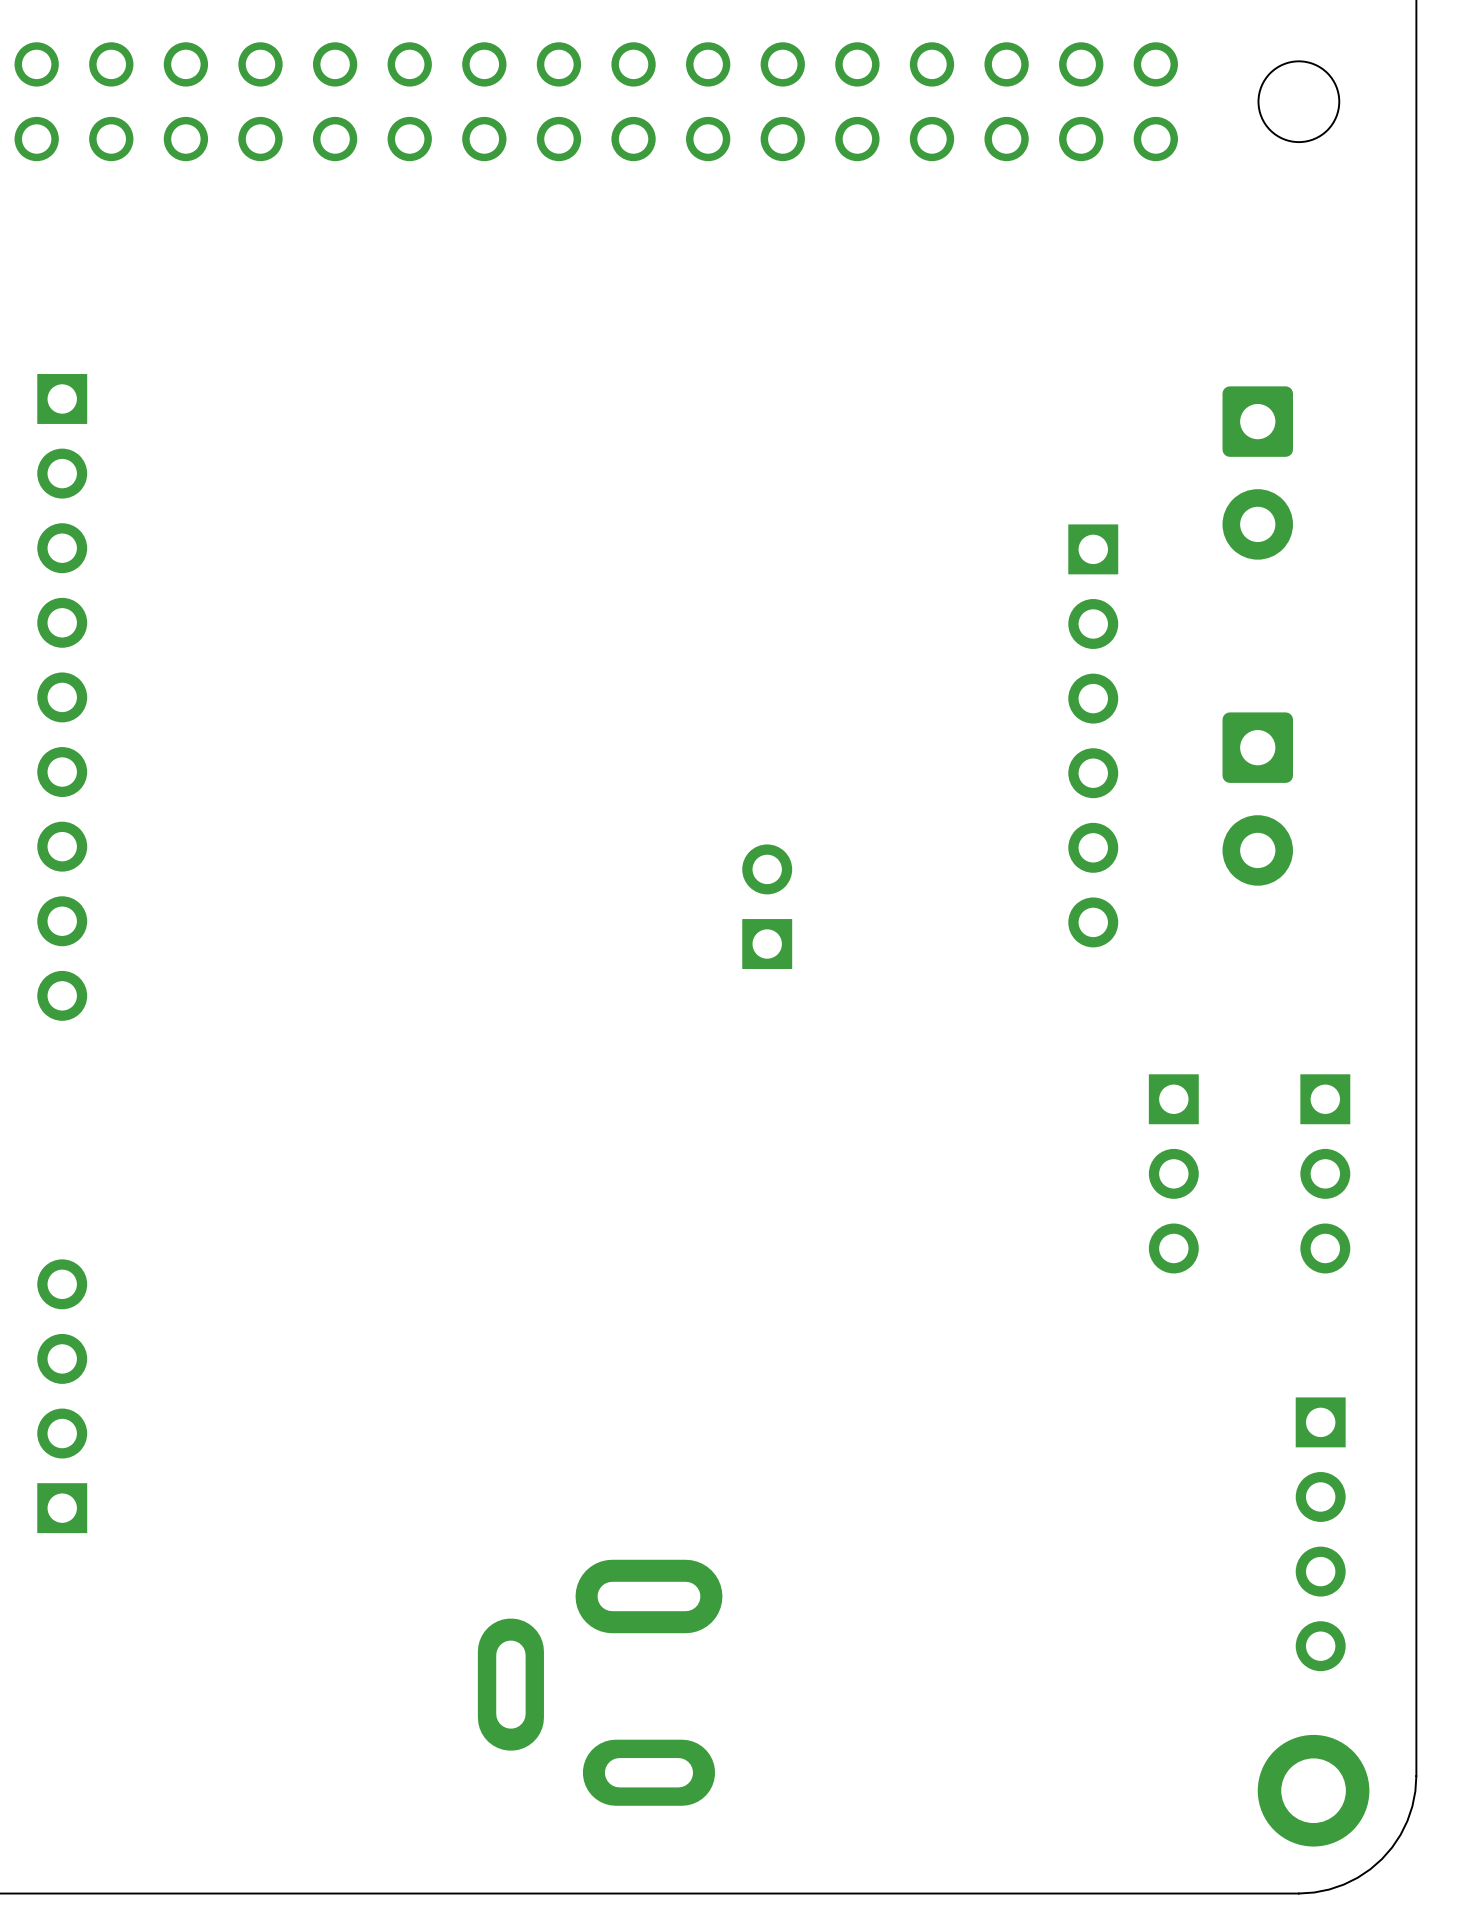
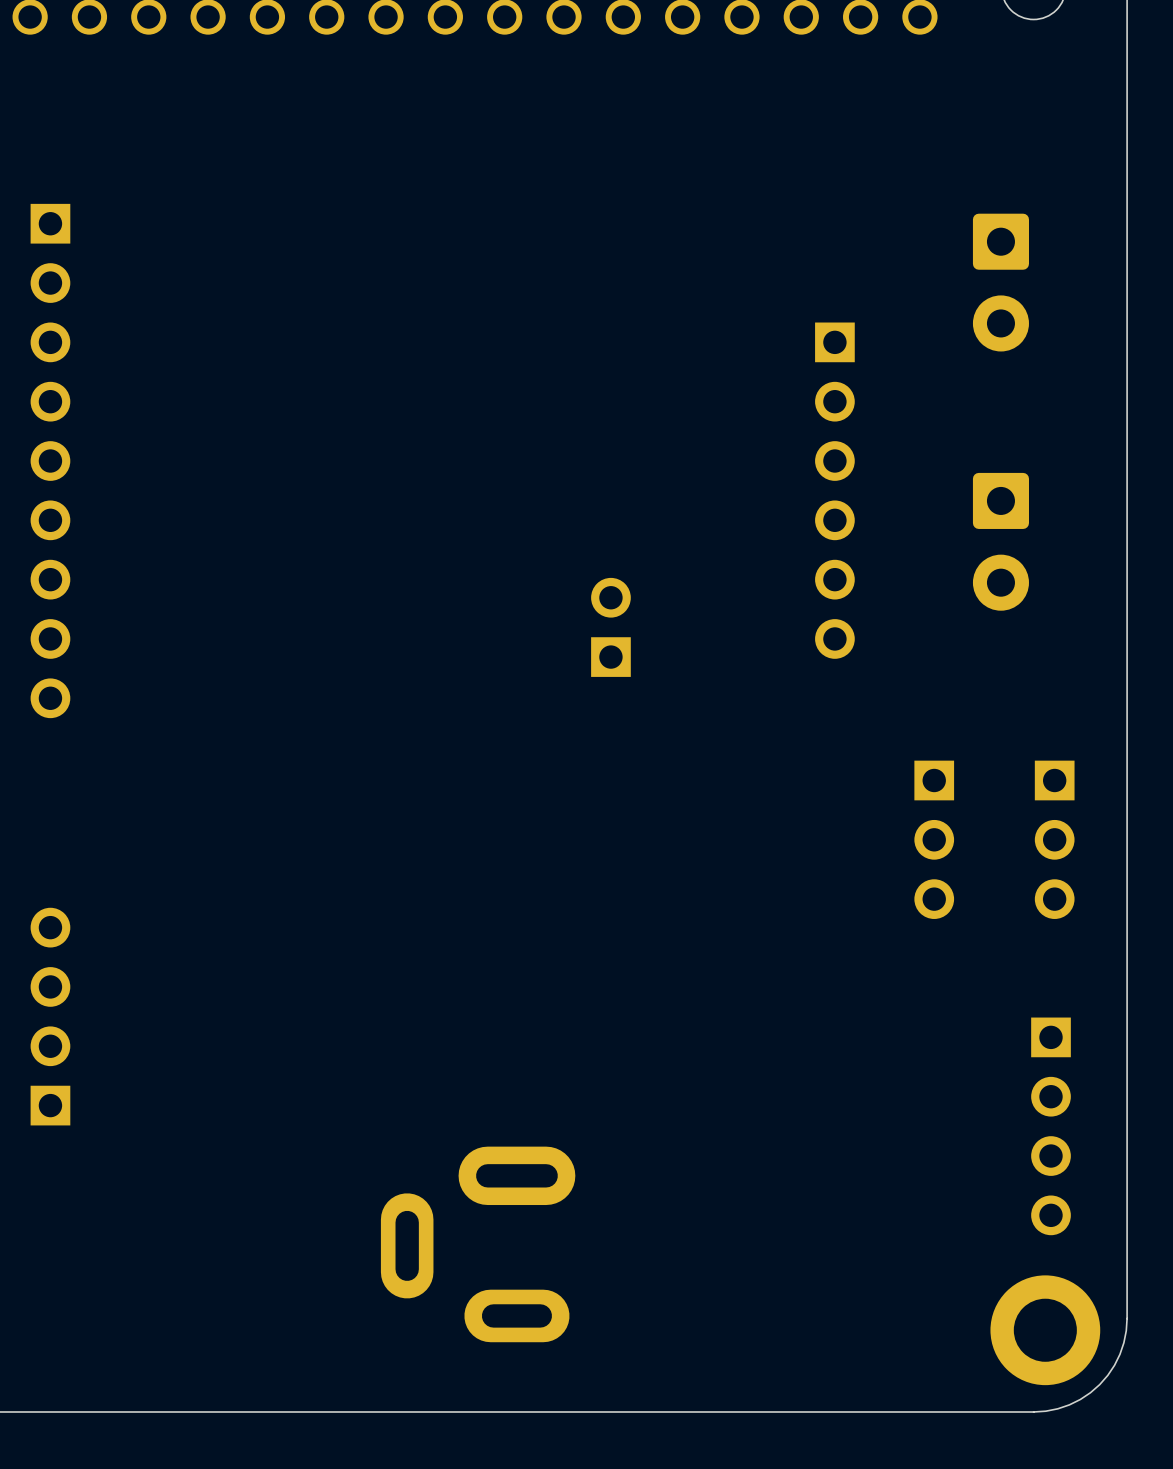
part position: (1093, 735) -> (834, 490)
part footprint: [1257, 1734, 1370, 1847] -> [990, 1275, 1101, 1386]

